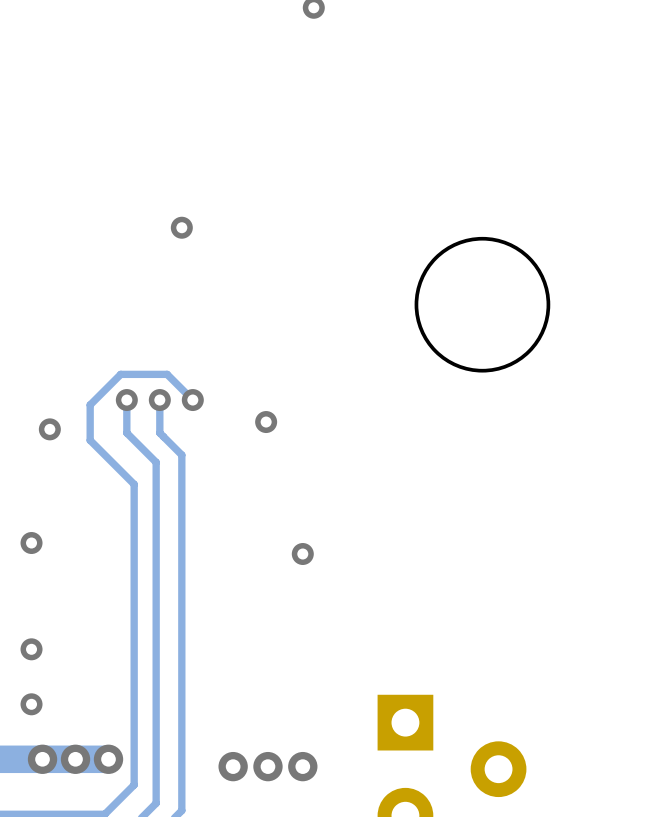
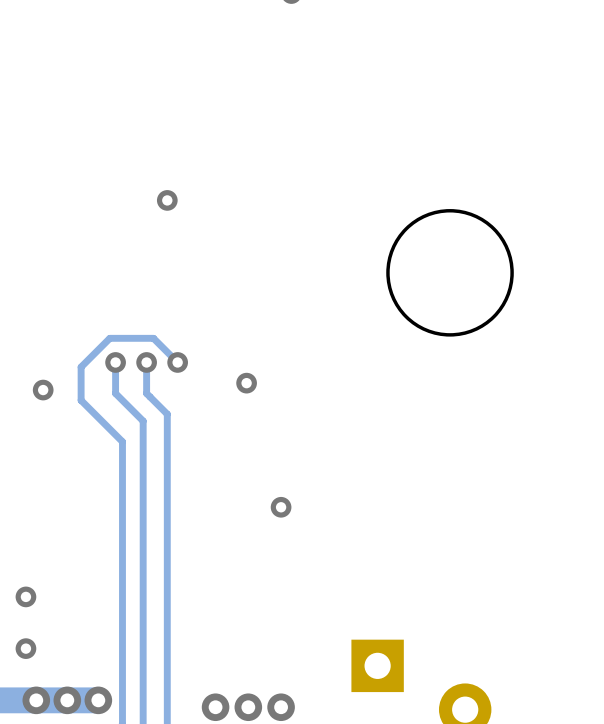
via: (31, 543) -> none

